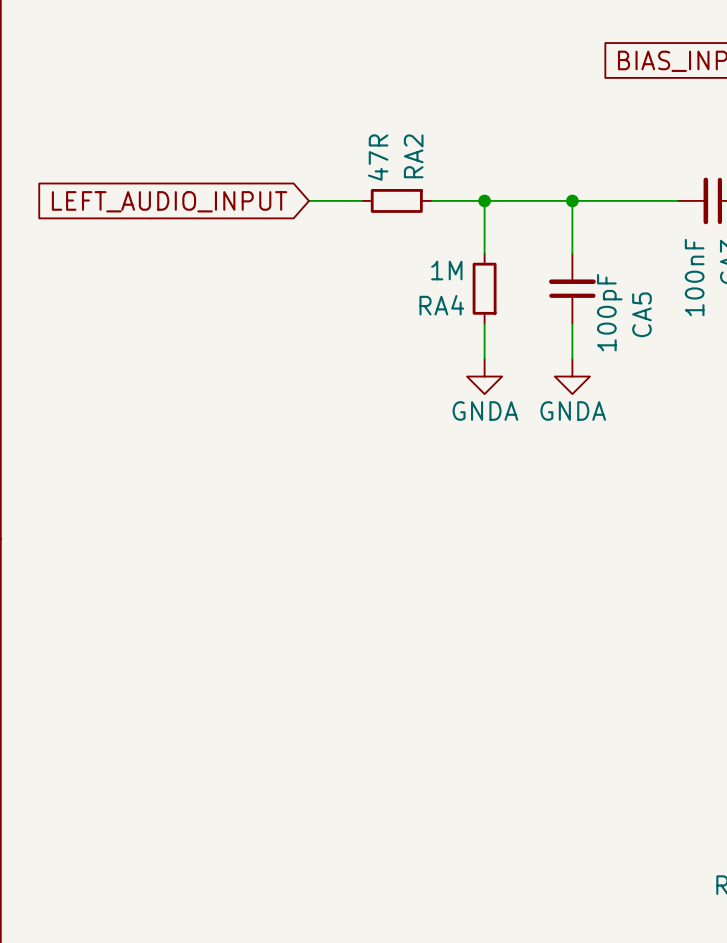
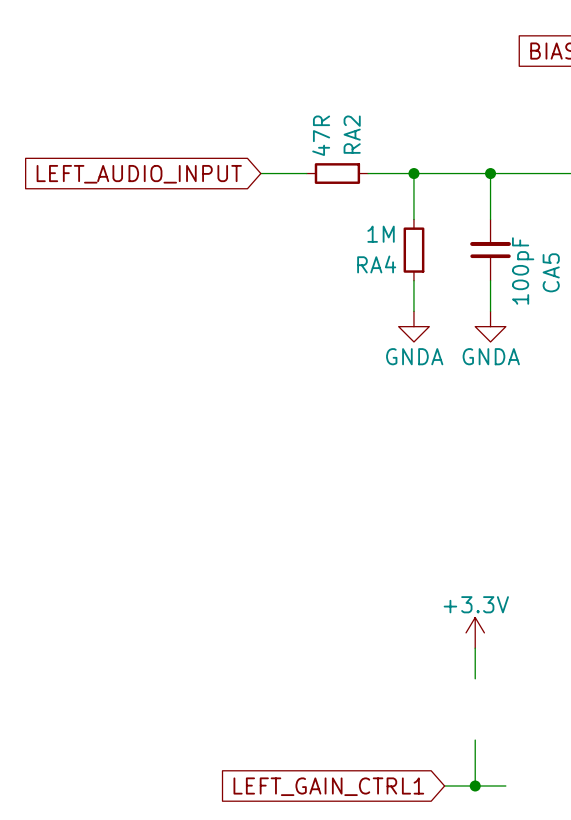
power symbol: none -> +3.3V (475, 632)
wire: none -> (475, 648) (475, 678)
wire: none -> (475, 740) (475, 785)
wire: none -> (444, 785) (505, 785)
junction: none -> (475, 785)
global label: none -> LEFT_GAIN_CTRL1 (328, 786)

